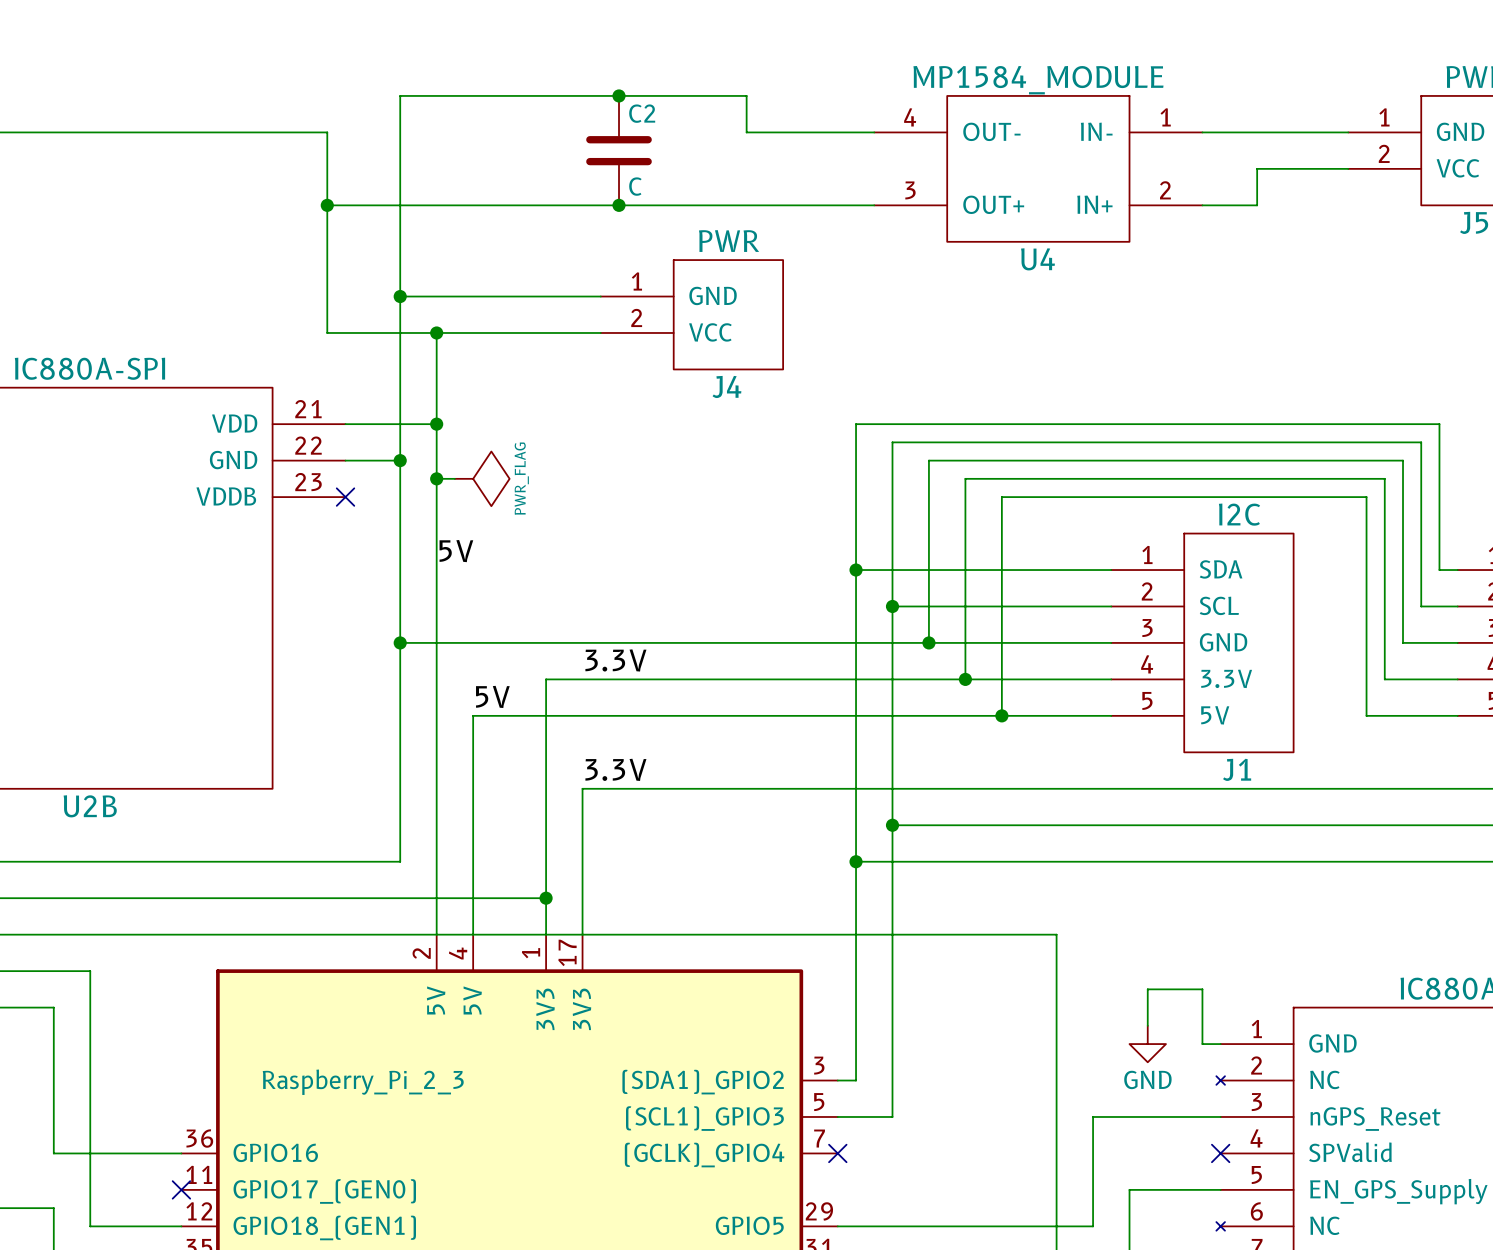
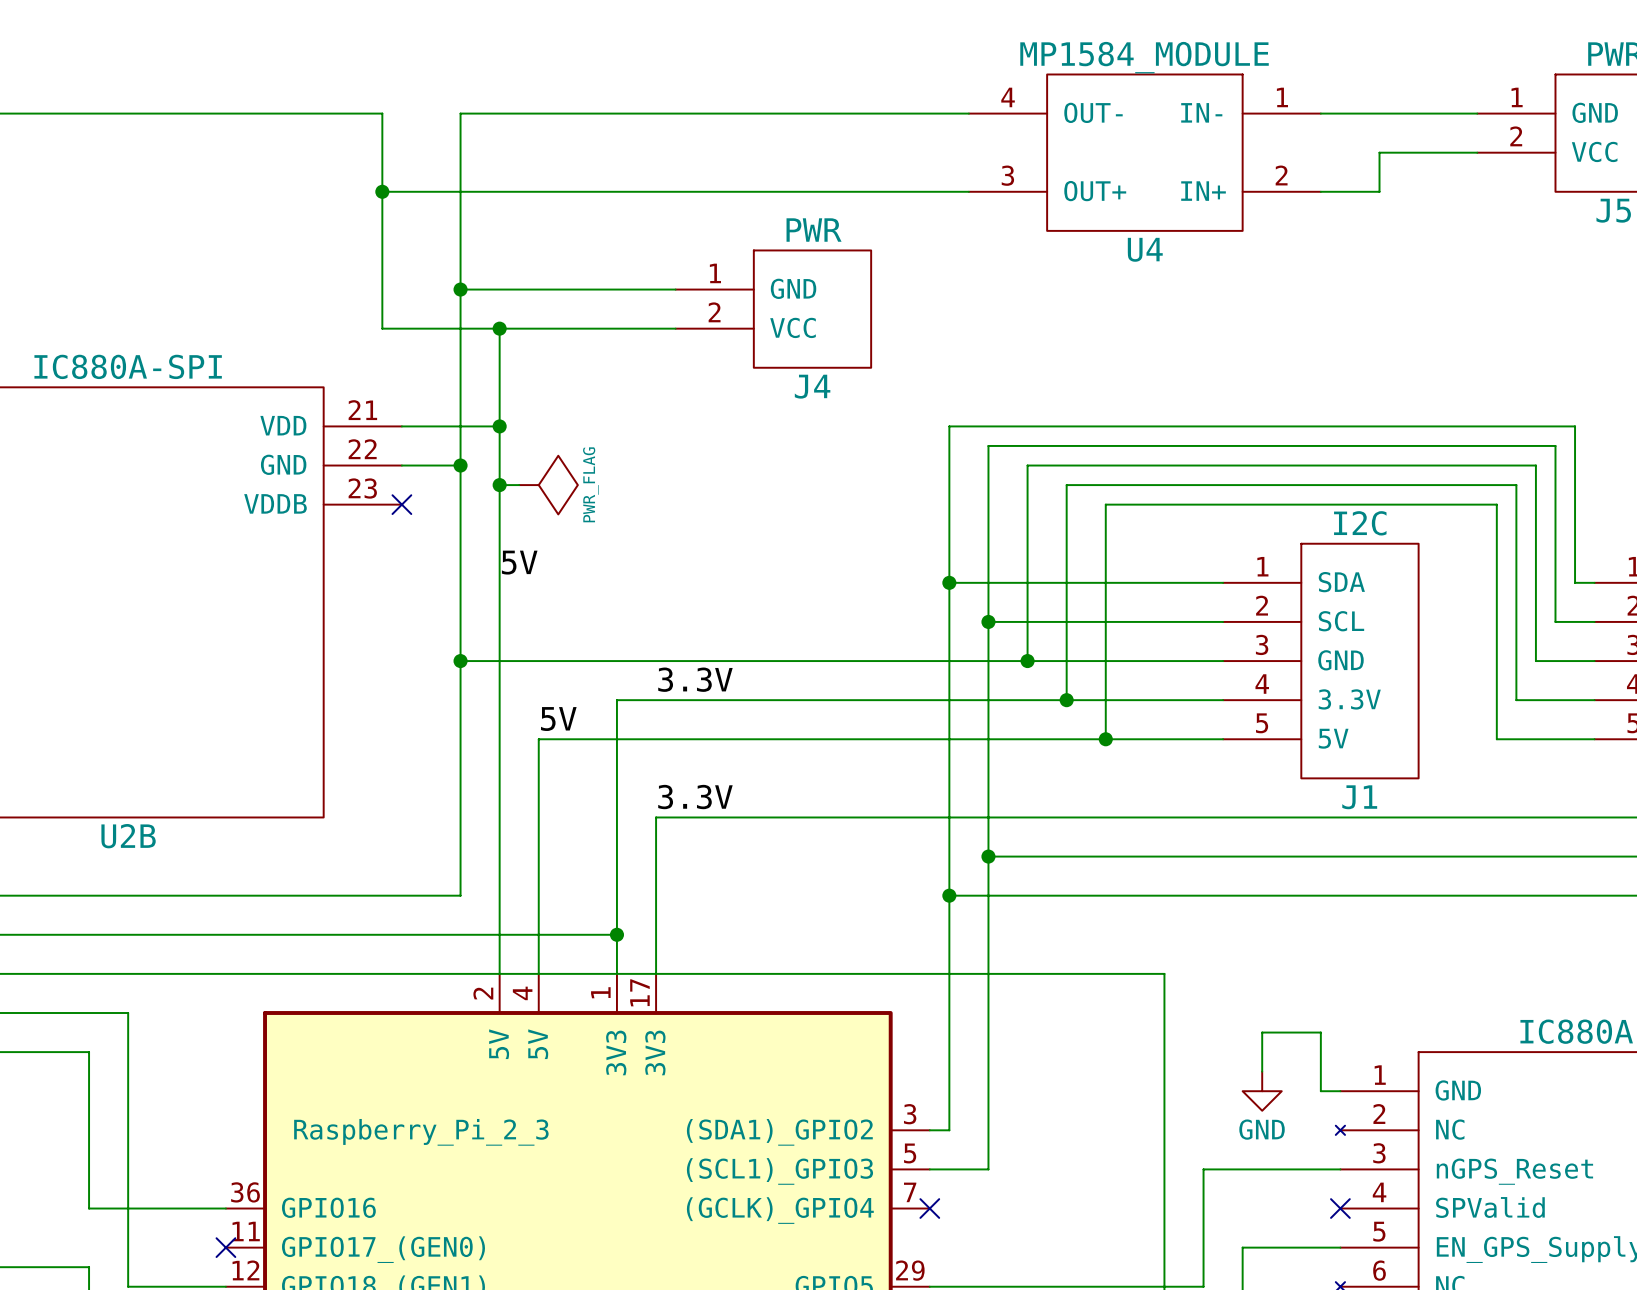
junction: (619, 95) -> none
wire: (400, 132) (400, 95) (746, 95) (746, 132) -> (460, 113) (832, 113)
C2: C (619, 150) -> none
junction: (619, 205) -> none

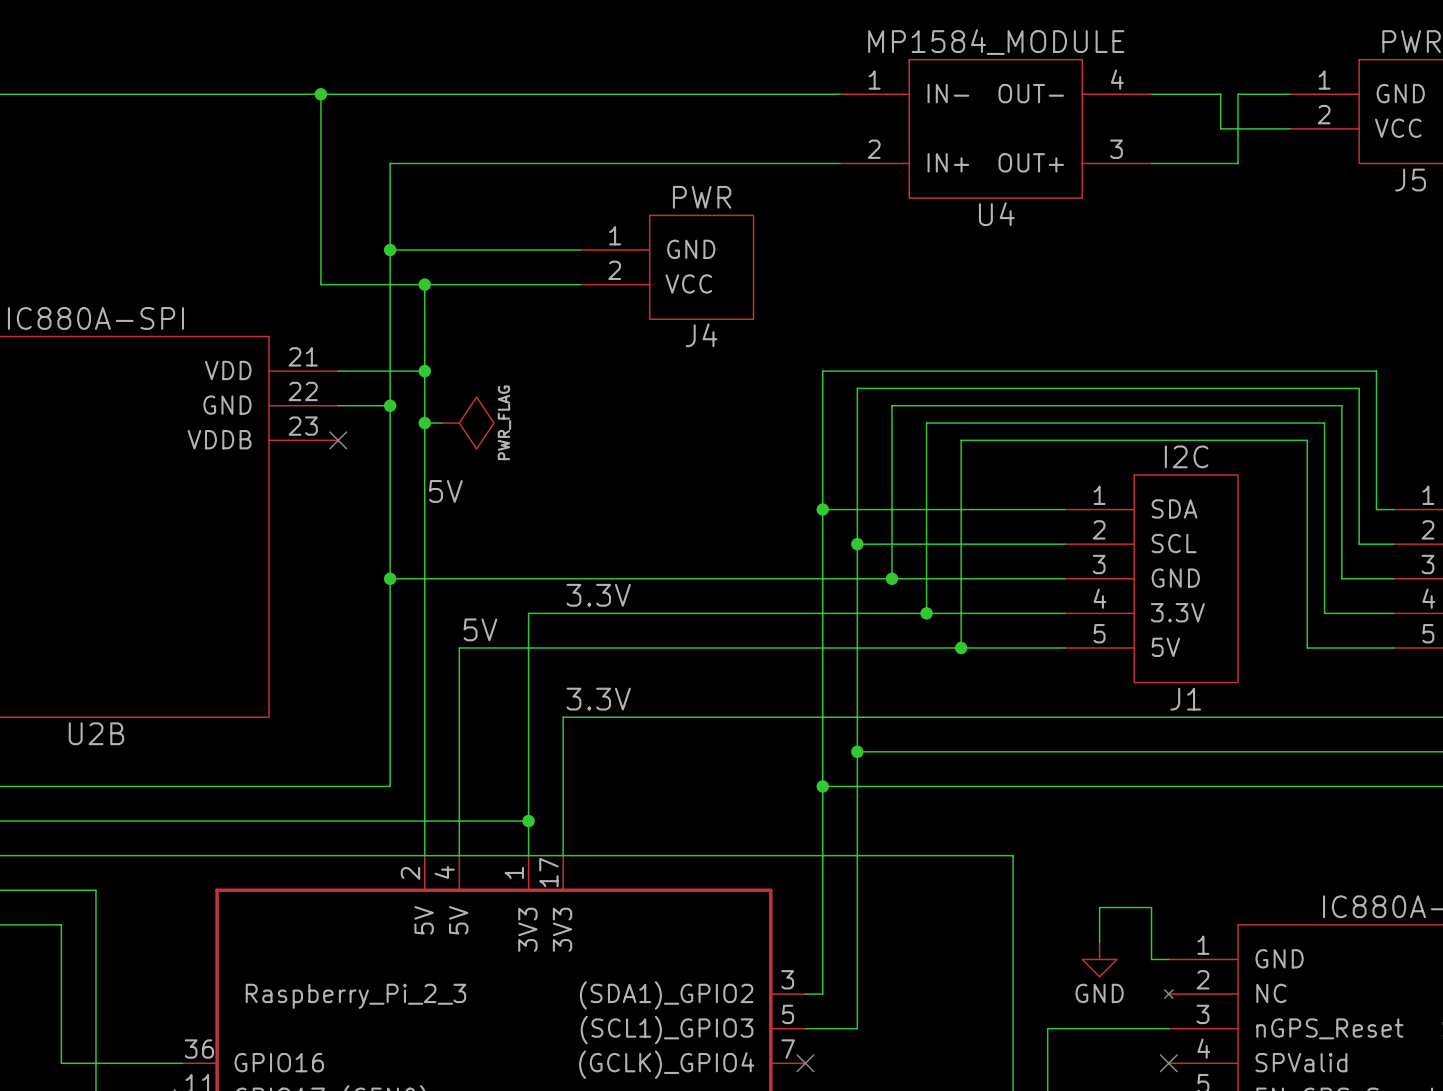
wire: (460, 113) (460, 191) (382, 191) -> (390, 94) (320, 94)
wire: (1399, 113) (1418, 113) -> (1220, 94) (1220, 128)
U4 flip: as is (1144, 152) -> left-right (995, 128)
wire: (1399, 152) (1379, 152) (1379, 191) -> (1238, 94) (1238, 163) (1203, 163)
junction position: (382, 191) -> (320, 94)

